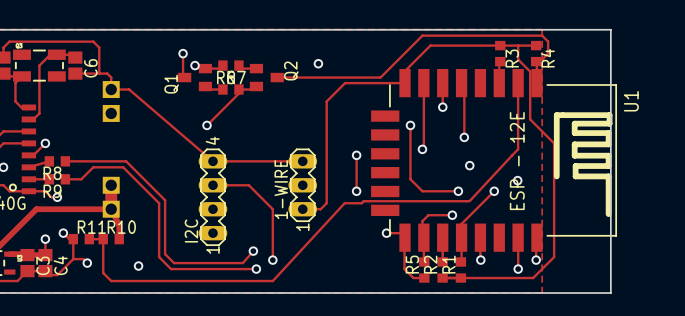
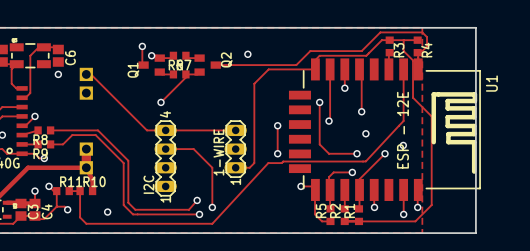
track: (488, 35) (422, 35) (398, 59) -> (380, 32) (361, 51) (310, 51)
track: (490, 45) (430, 45) (410, 65) -> (381, 40) (366, 55) (319, 55)
track: (3, 57) (3, 47) (9, 41) (93, 41) (99, 47) (99, 73) -> none
track: (75, 73) (107, 73) (111, 77) (111, 89) (129, 89) (212, 161) -> (91, 74) (147, 130) (165, 130)
via: none -> (58, 74)

